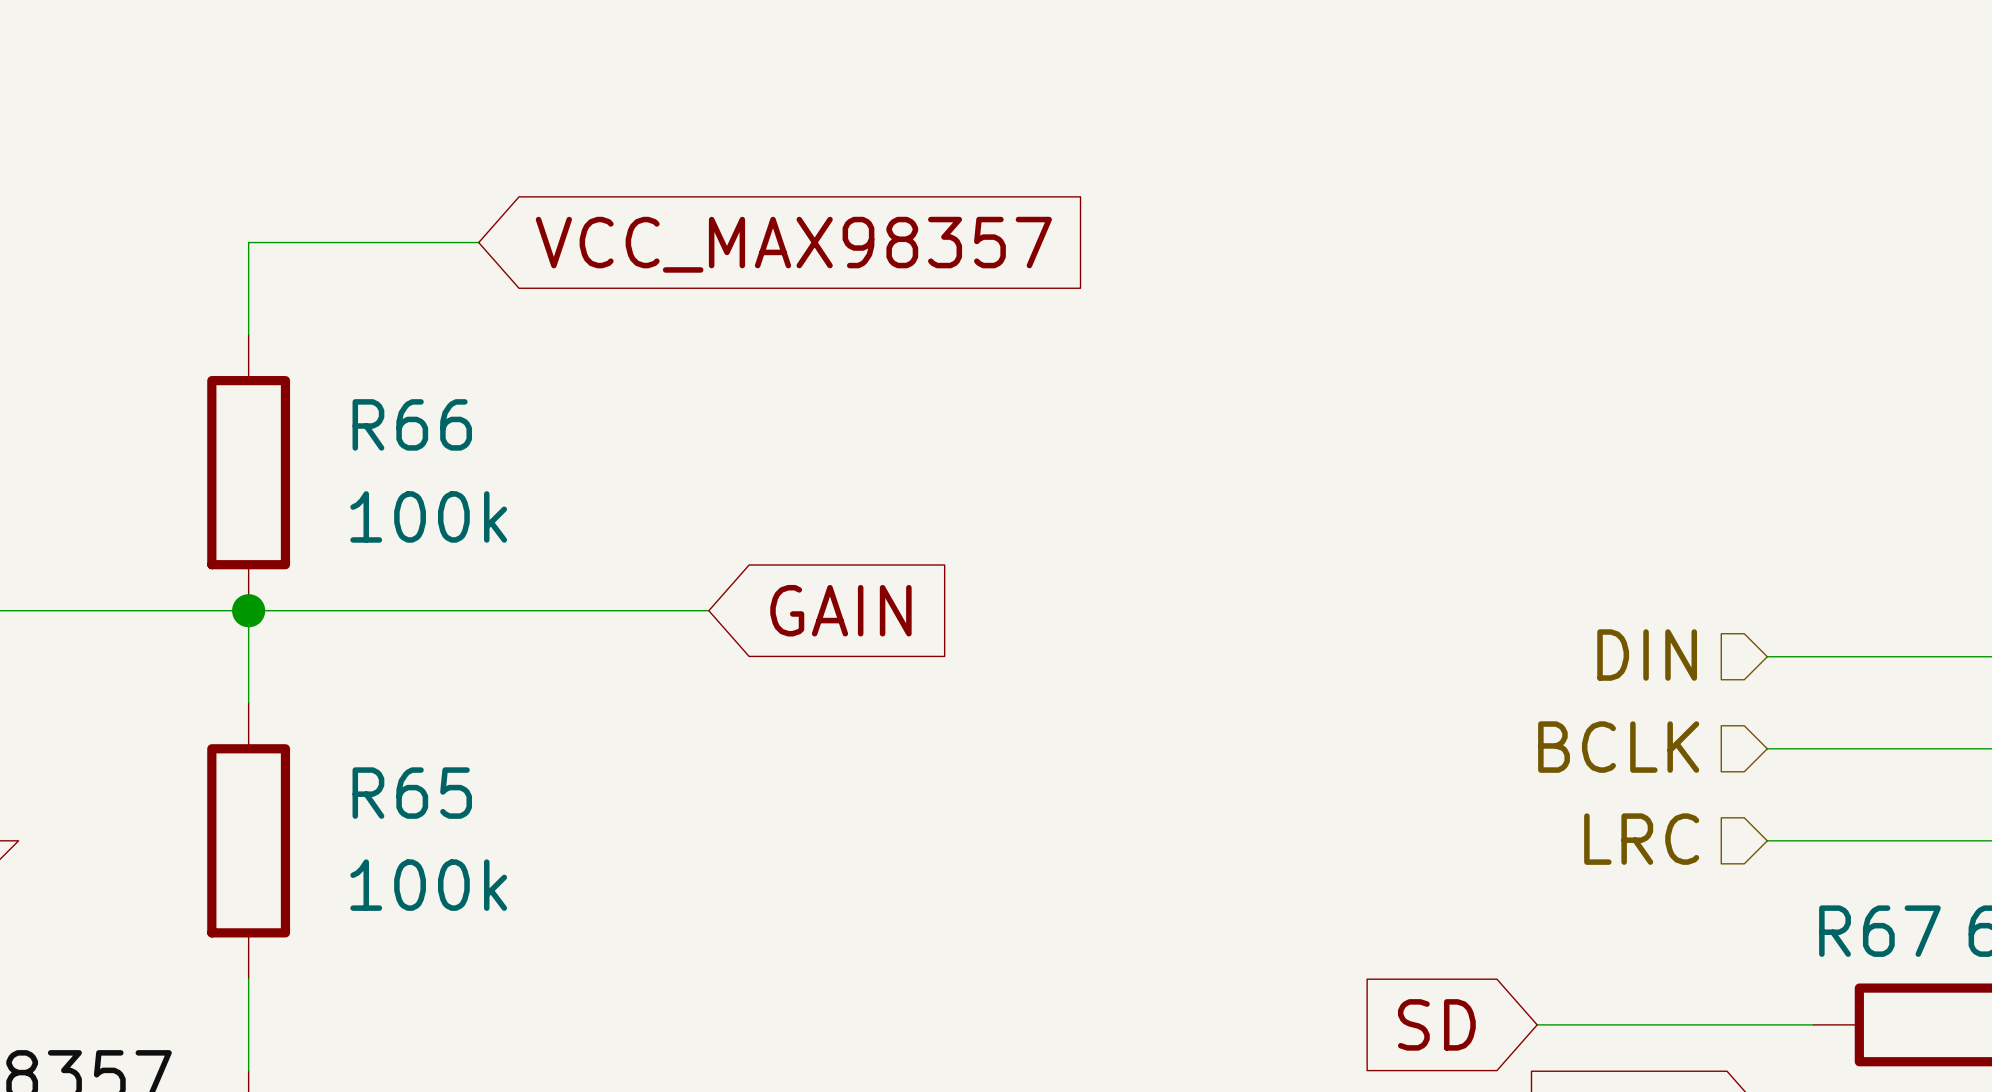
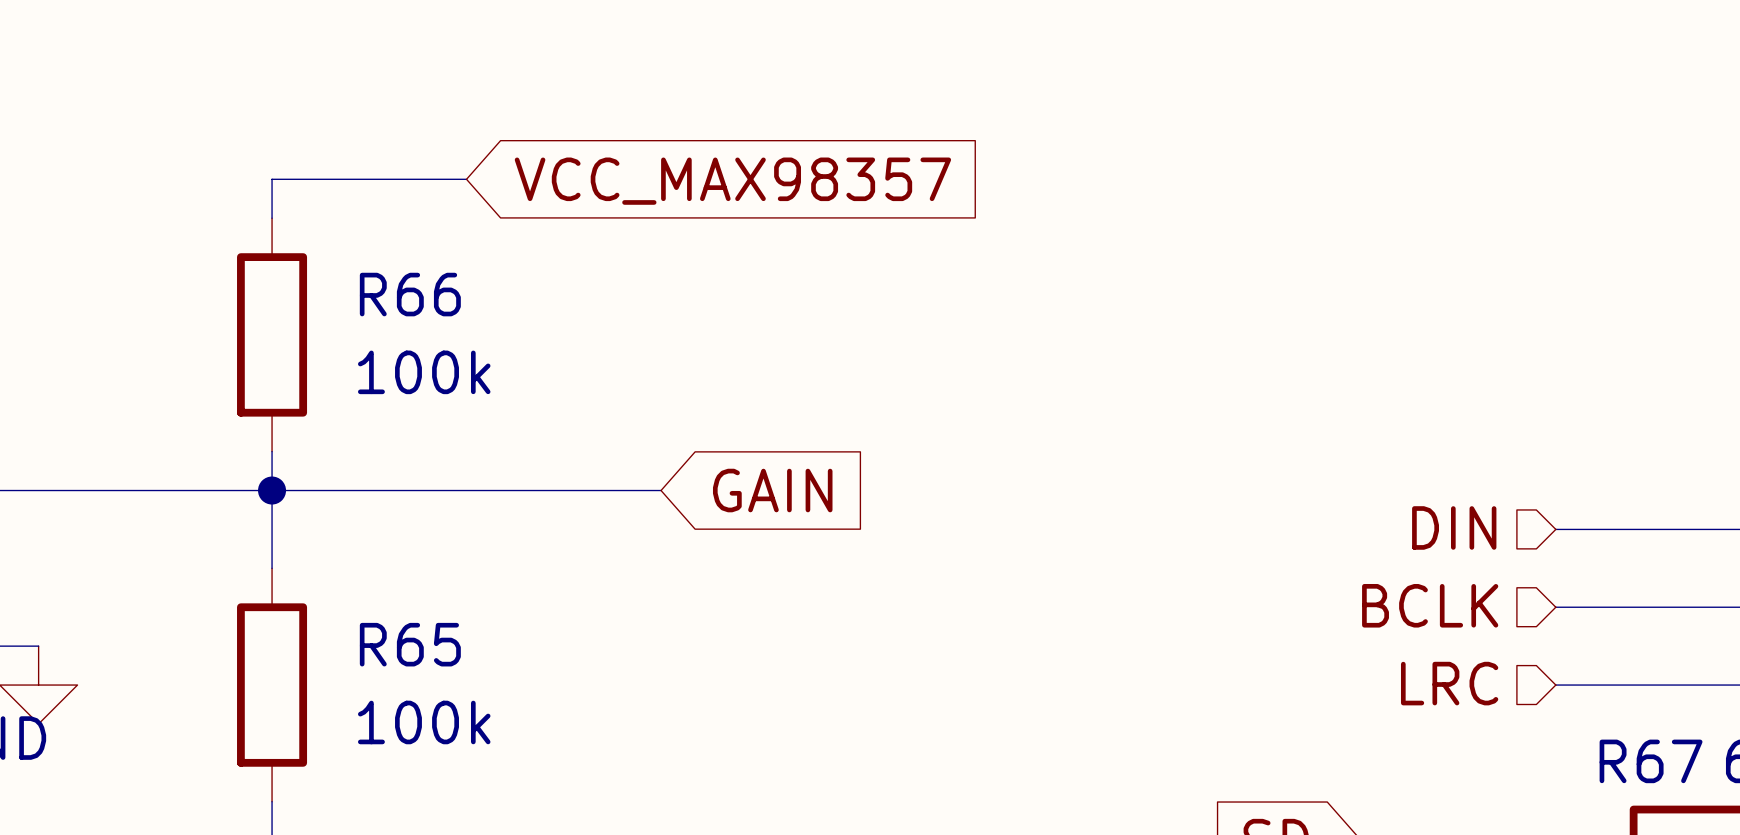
R66 position: (248, 472) -> (272, 334)

